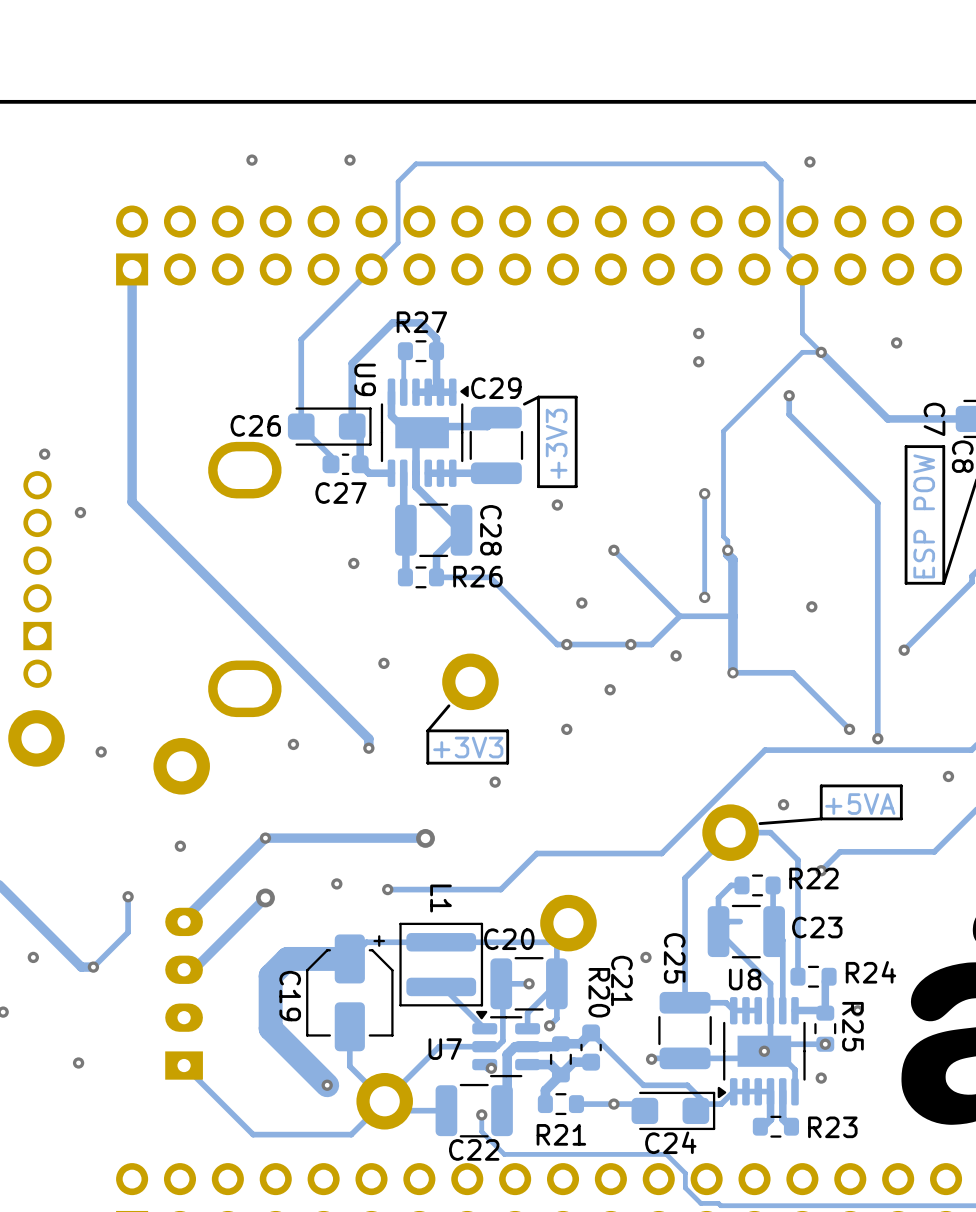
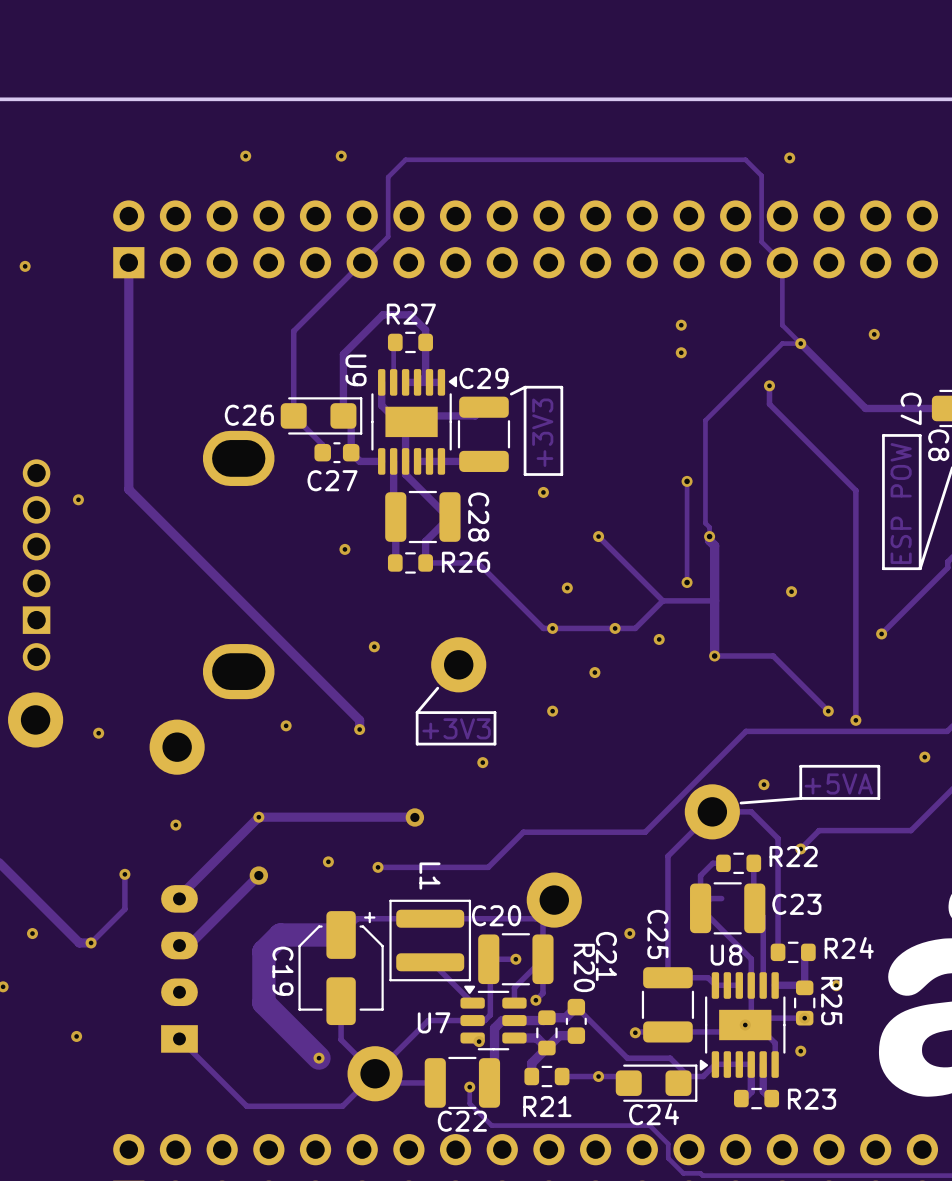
via: none -> (25, 266)
via: (44, 454) -> none

